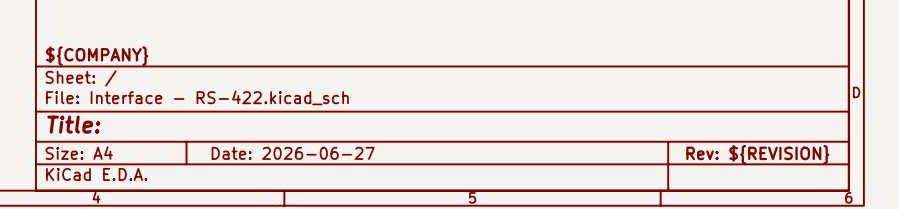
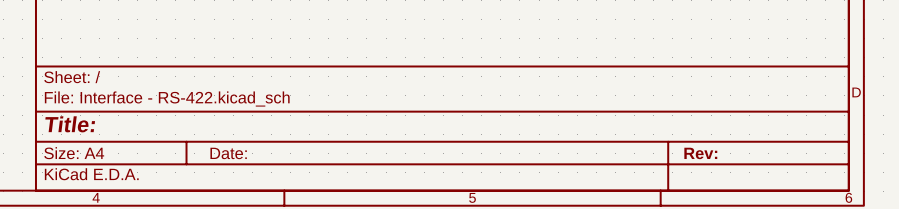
title block: ${COMPANY} (97, 56) -> none
title block: Date: 2026-06-27 (293, 153) -> Date: (228, 153)
title block: Rev: ${REVISION} (757, 154) -> Rev: (700, 153)

